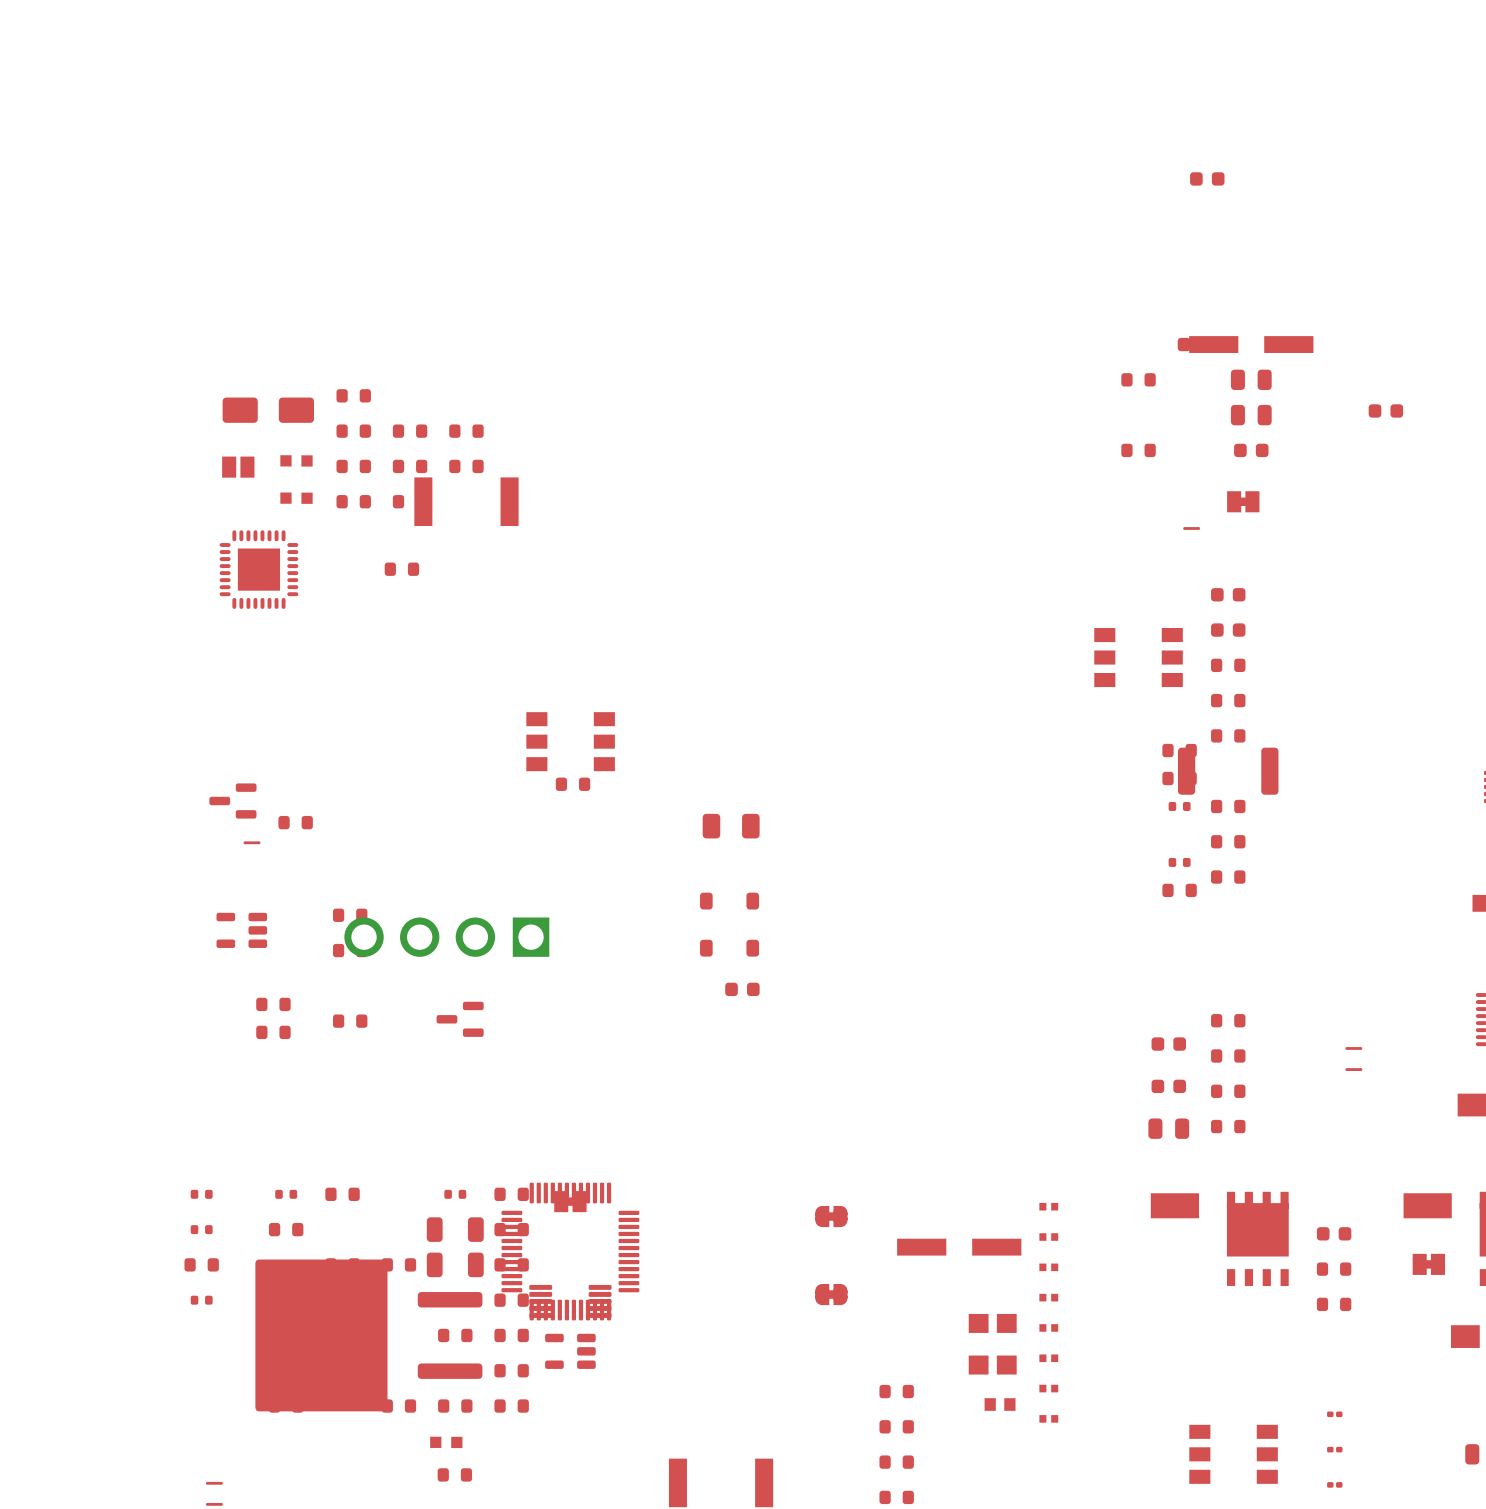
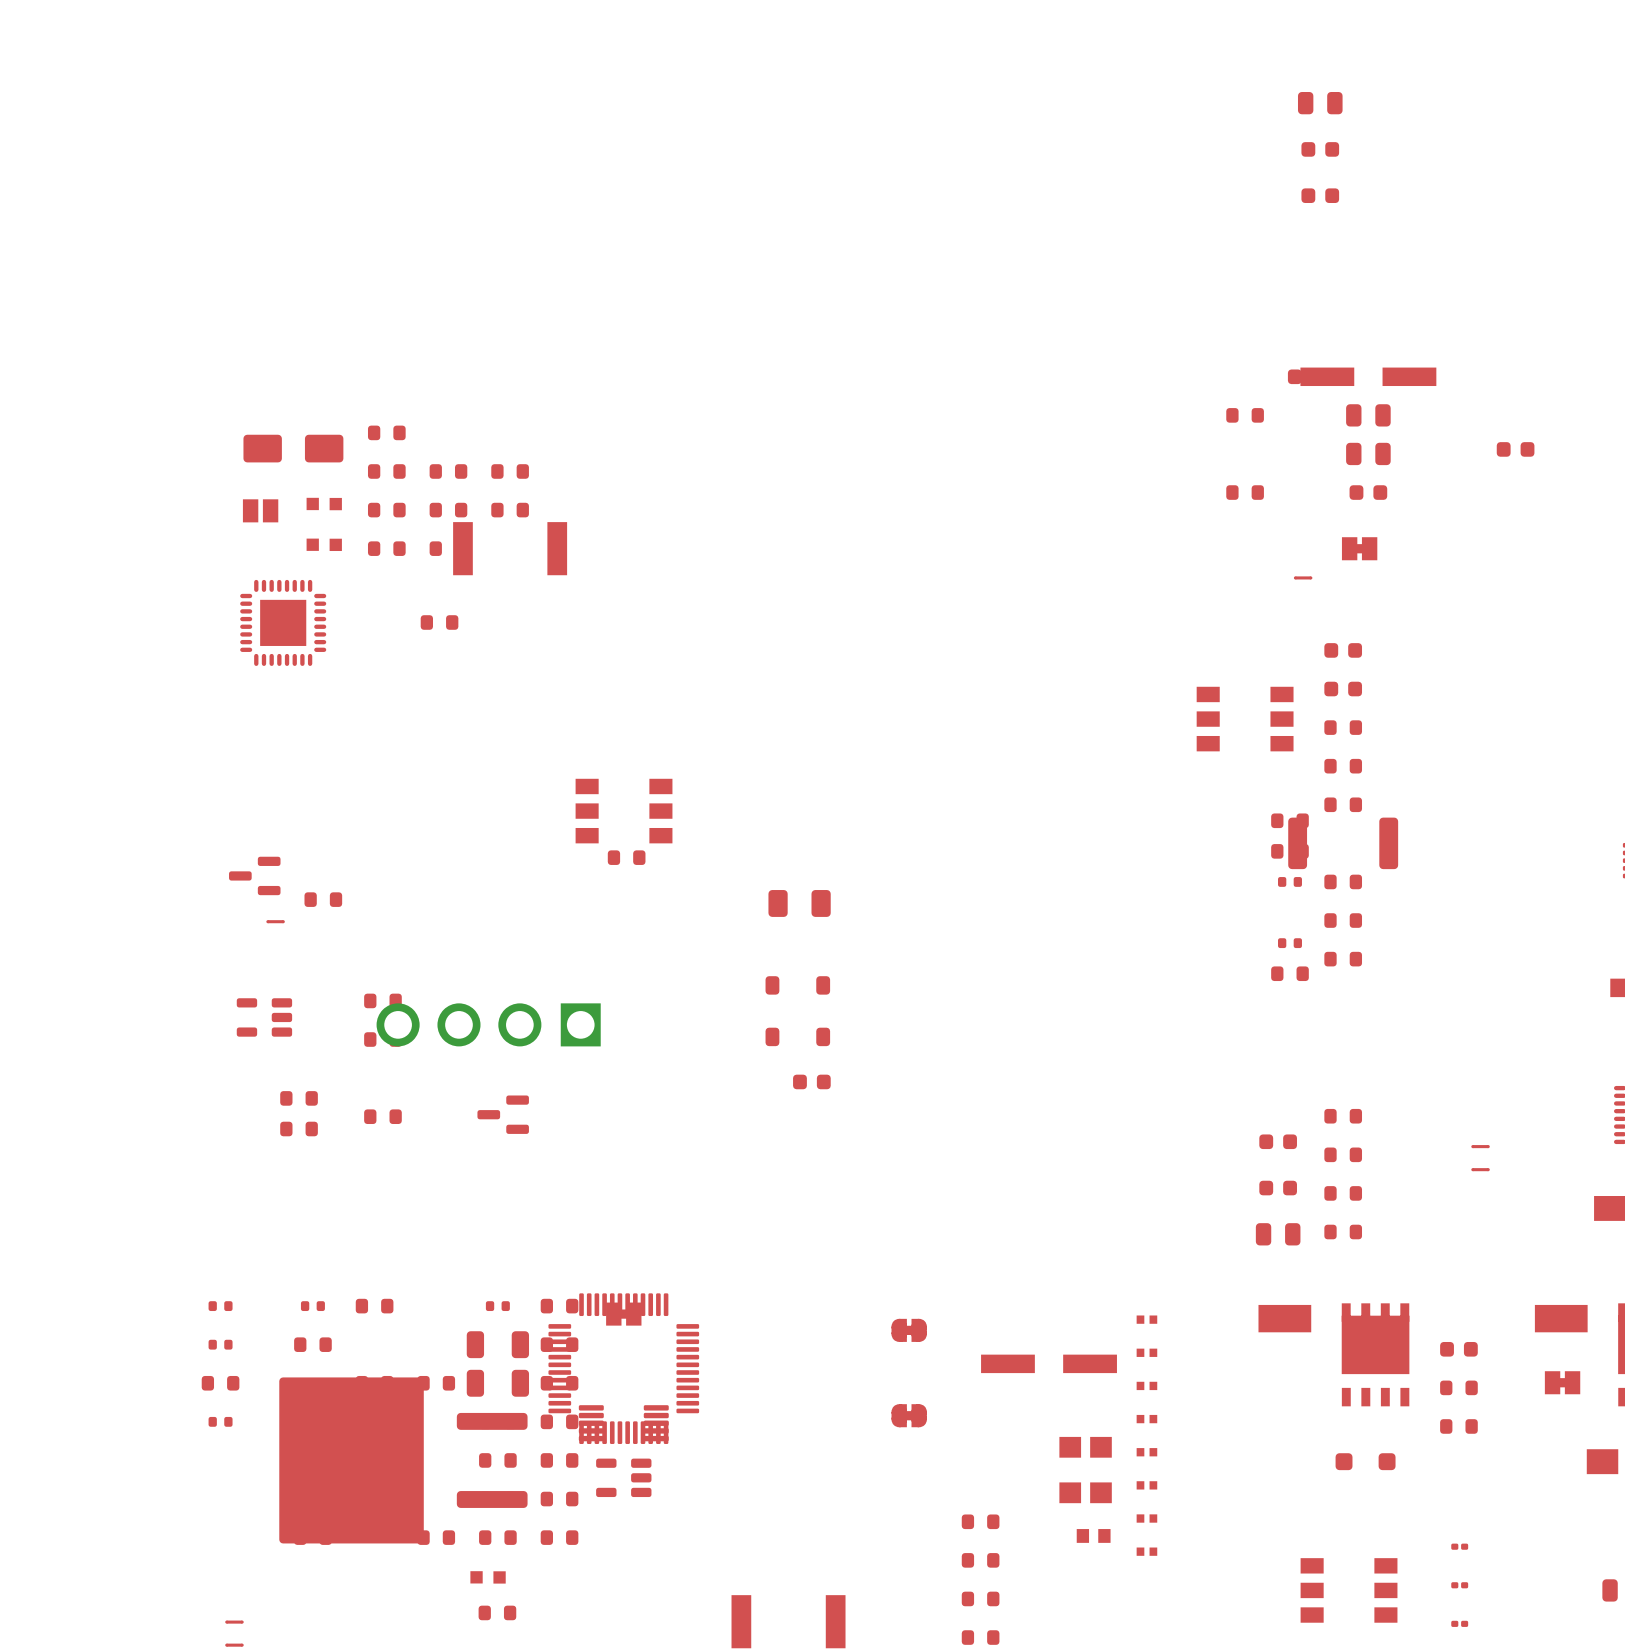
part: none -> (1320, 103)
part: none -> (1320, 149)
part: none -> (1365, 1461)

